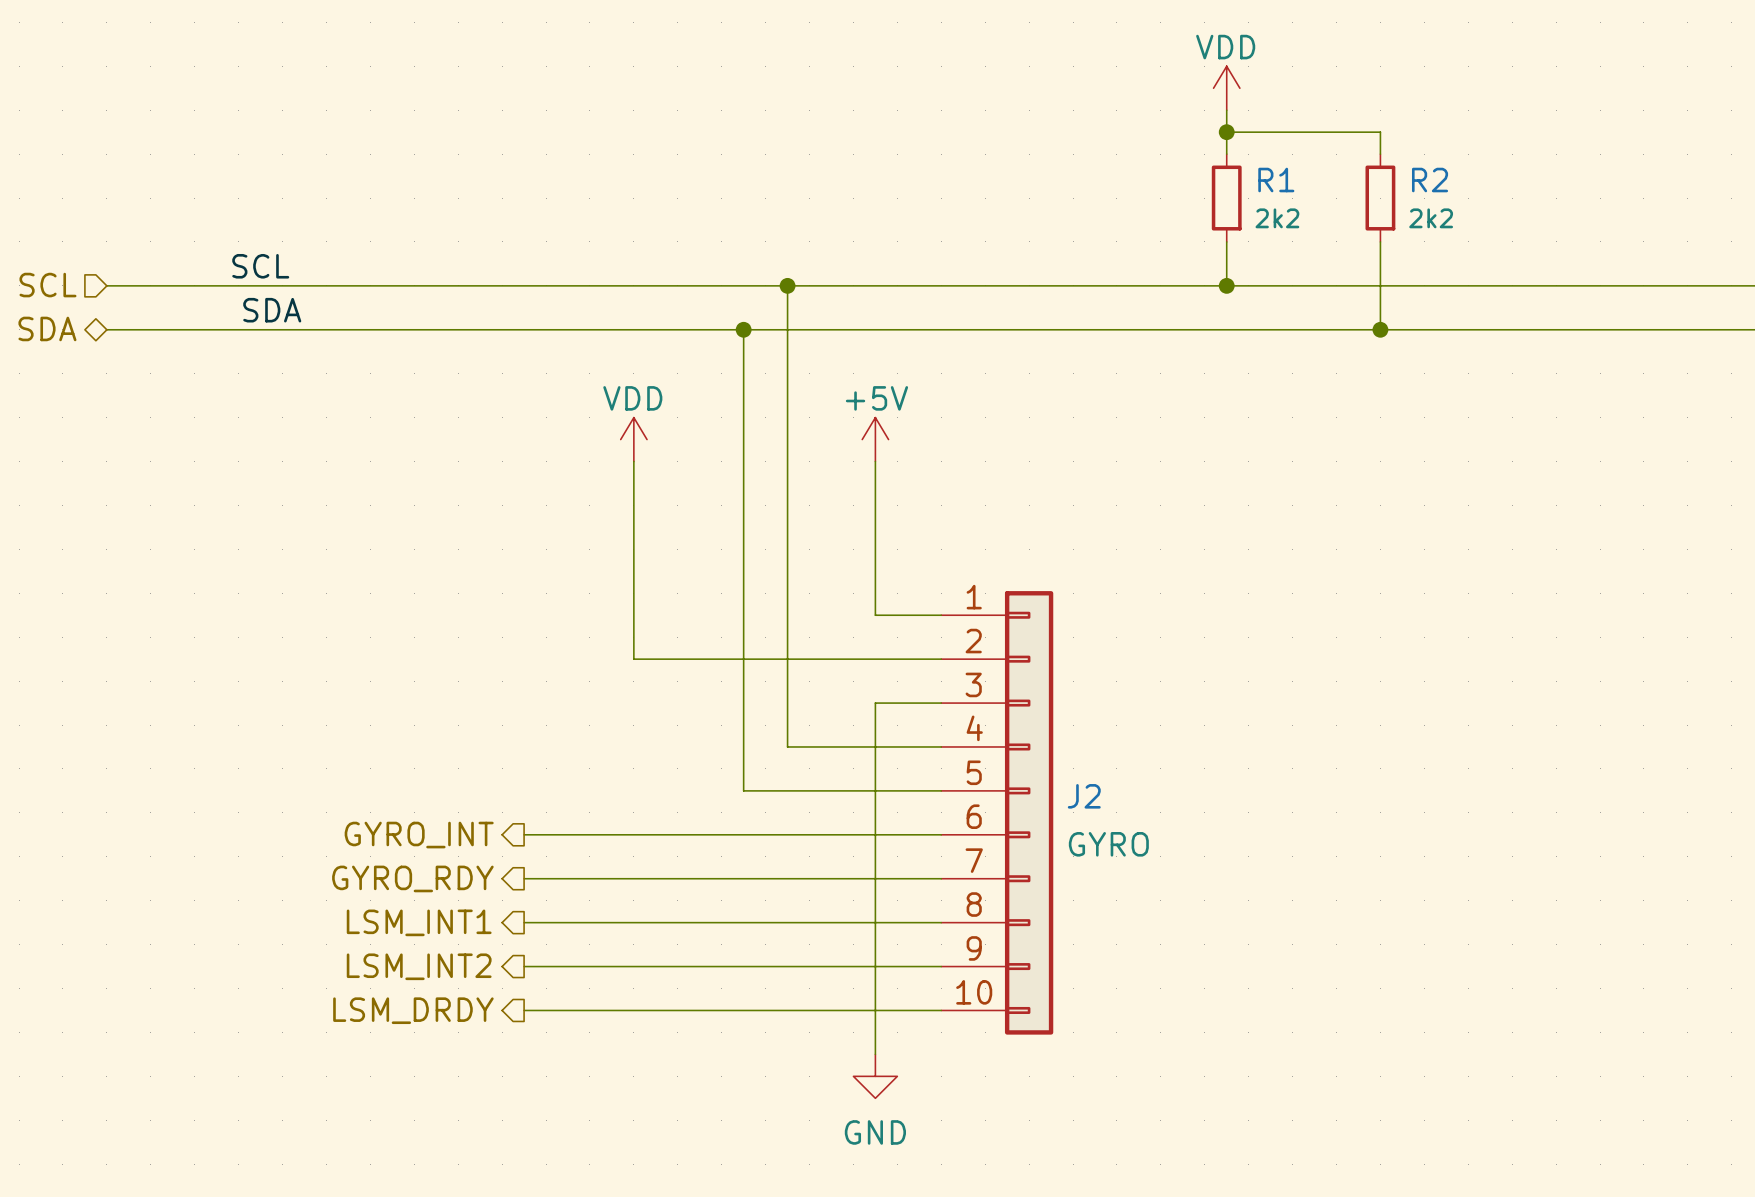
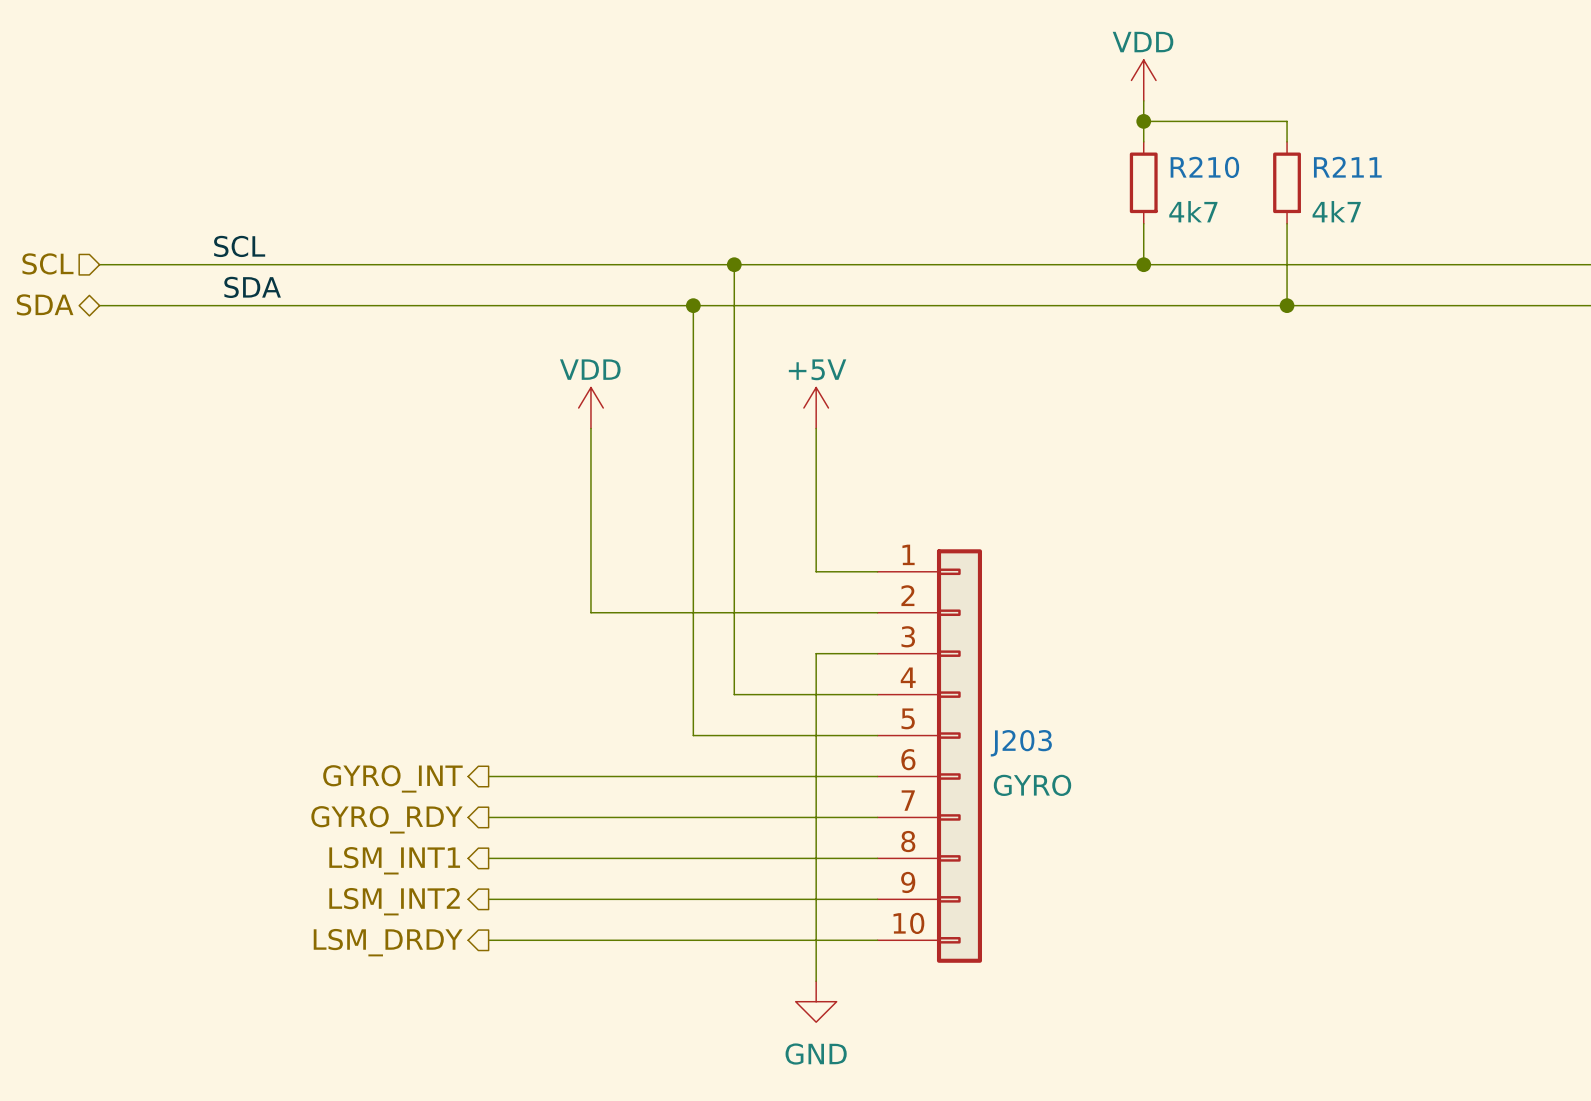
R1 name: R1 (1276, 180) -> R210 (1204, 167)
R2 name: R2 (1430, 180) -> R211 (1347, 167)
R1 value: 2k2 (1277, 218) -> 4k7 (1193, 211)
R2 value: 2k2 (1431, 218) -> 4k7 (1336, 211)
J2 name: J2 (1084, 796) -> J203 (1021, 743)

